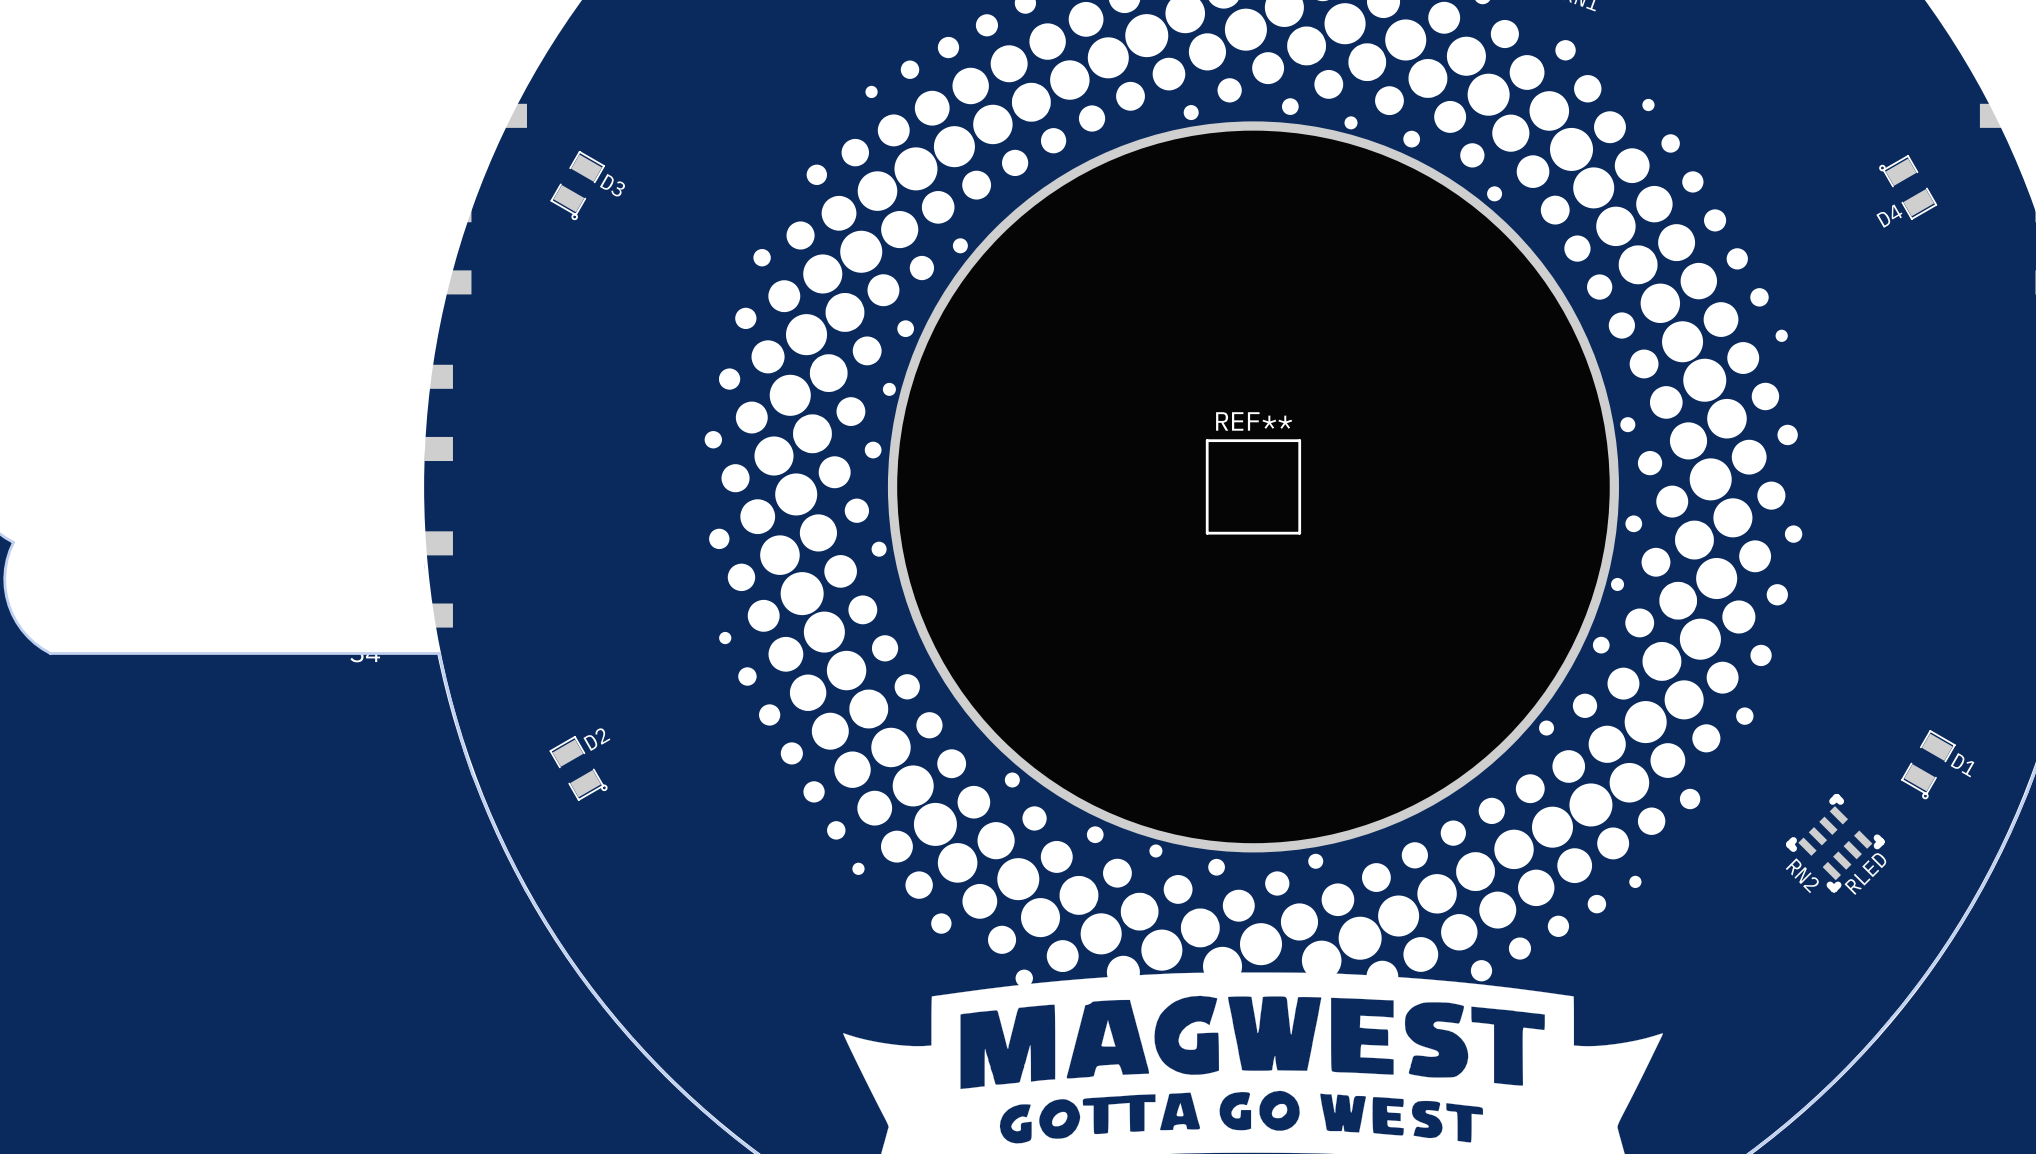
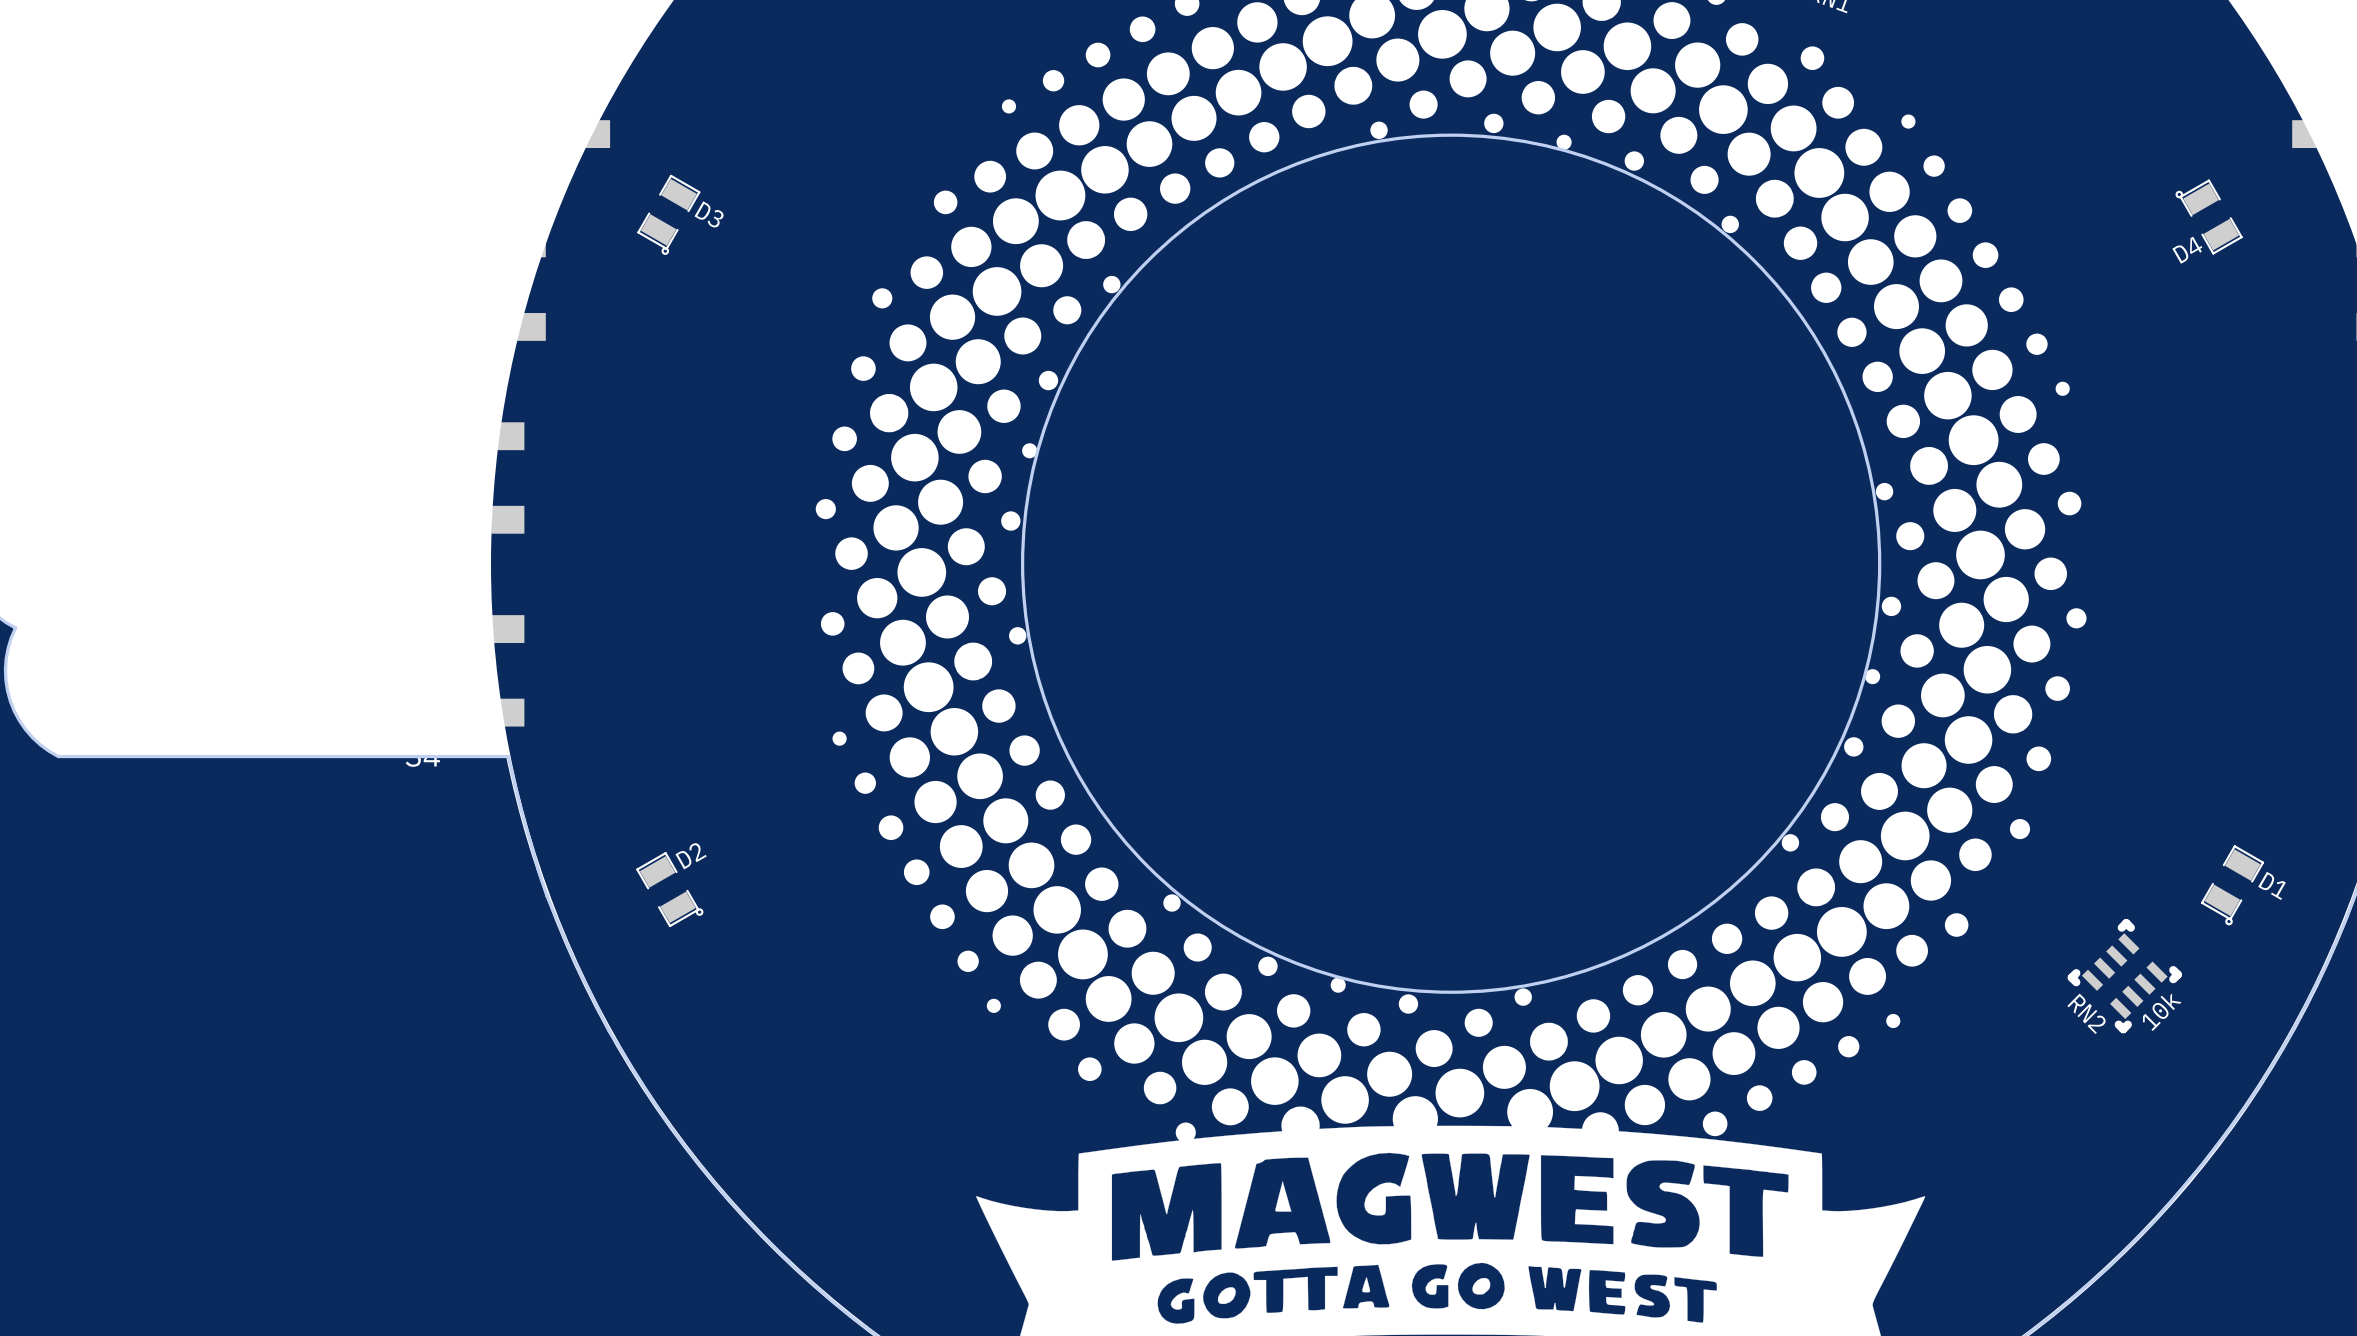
round board edge: none -> [1021, 133, 1882, 994]
REF**: (1253, 486) -> none
RN2 value: RLED (1865, 873) -> 10k (2162, 1012)

